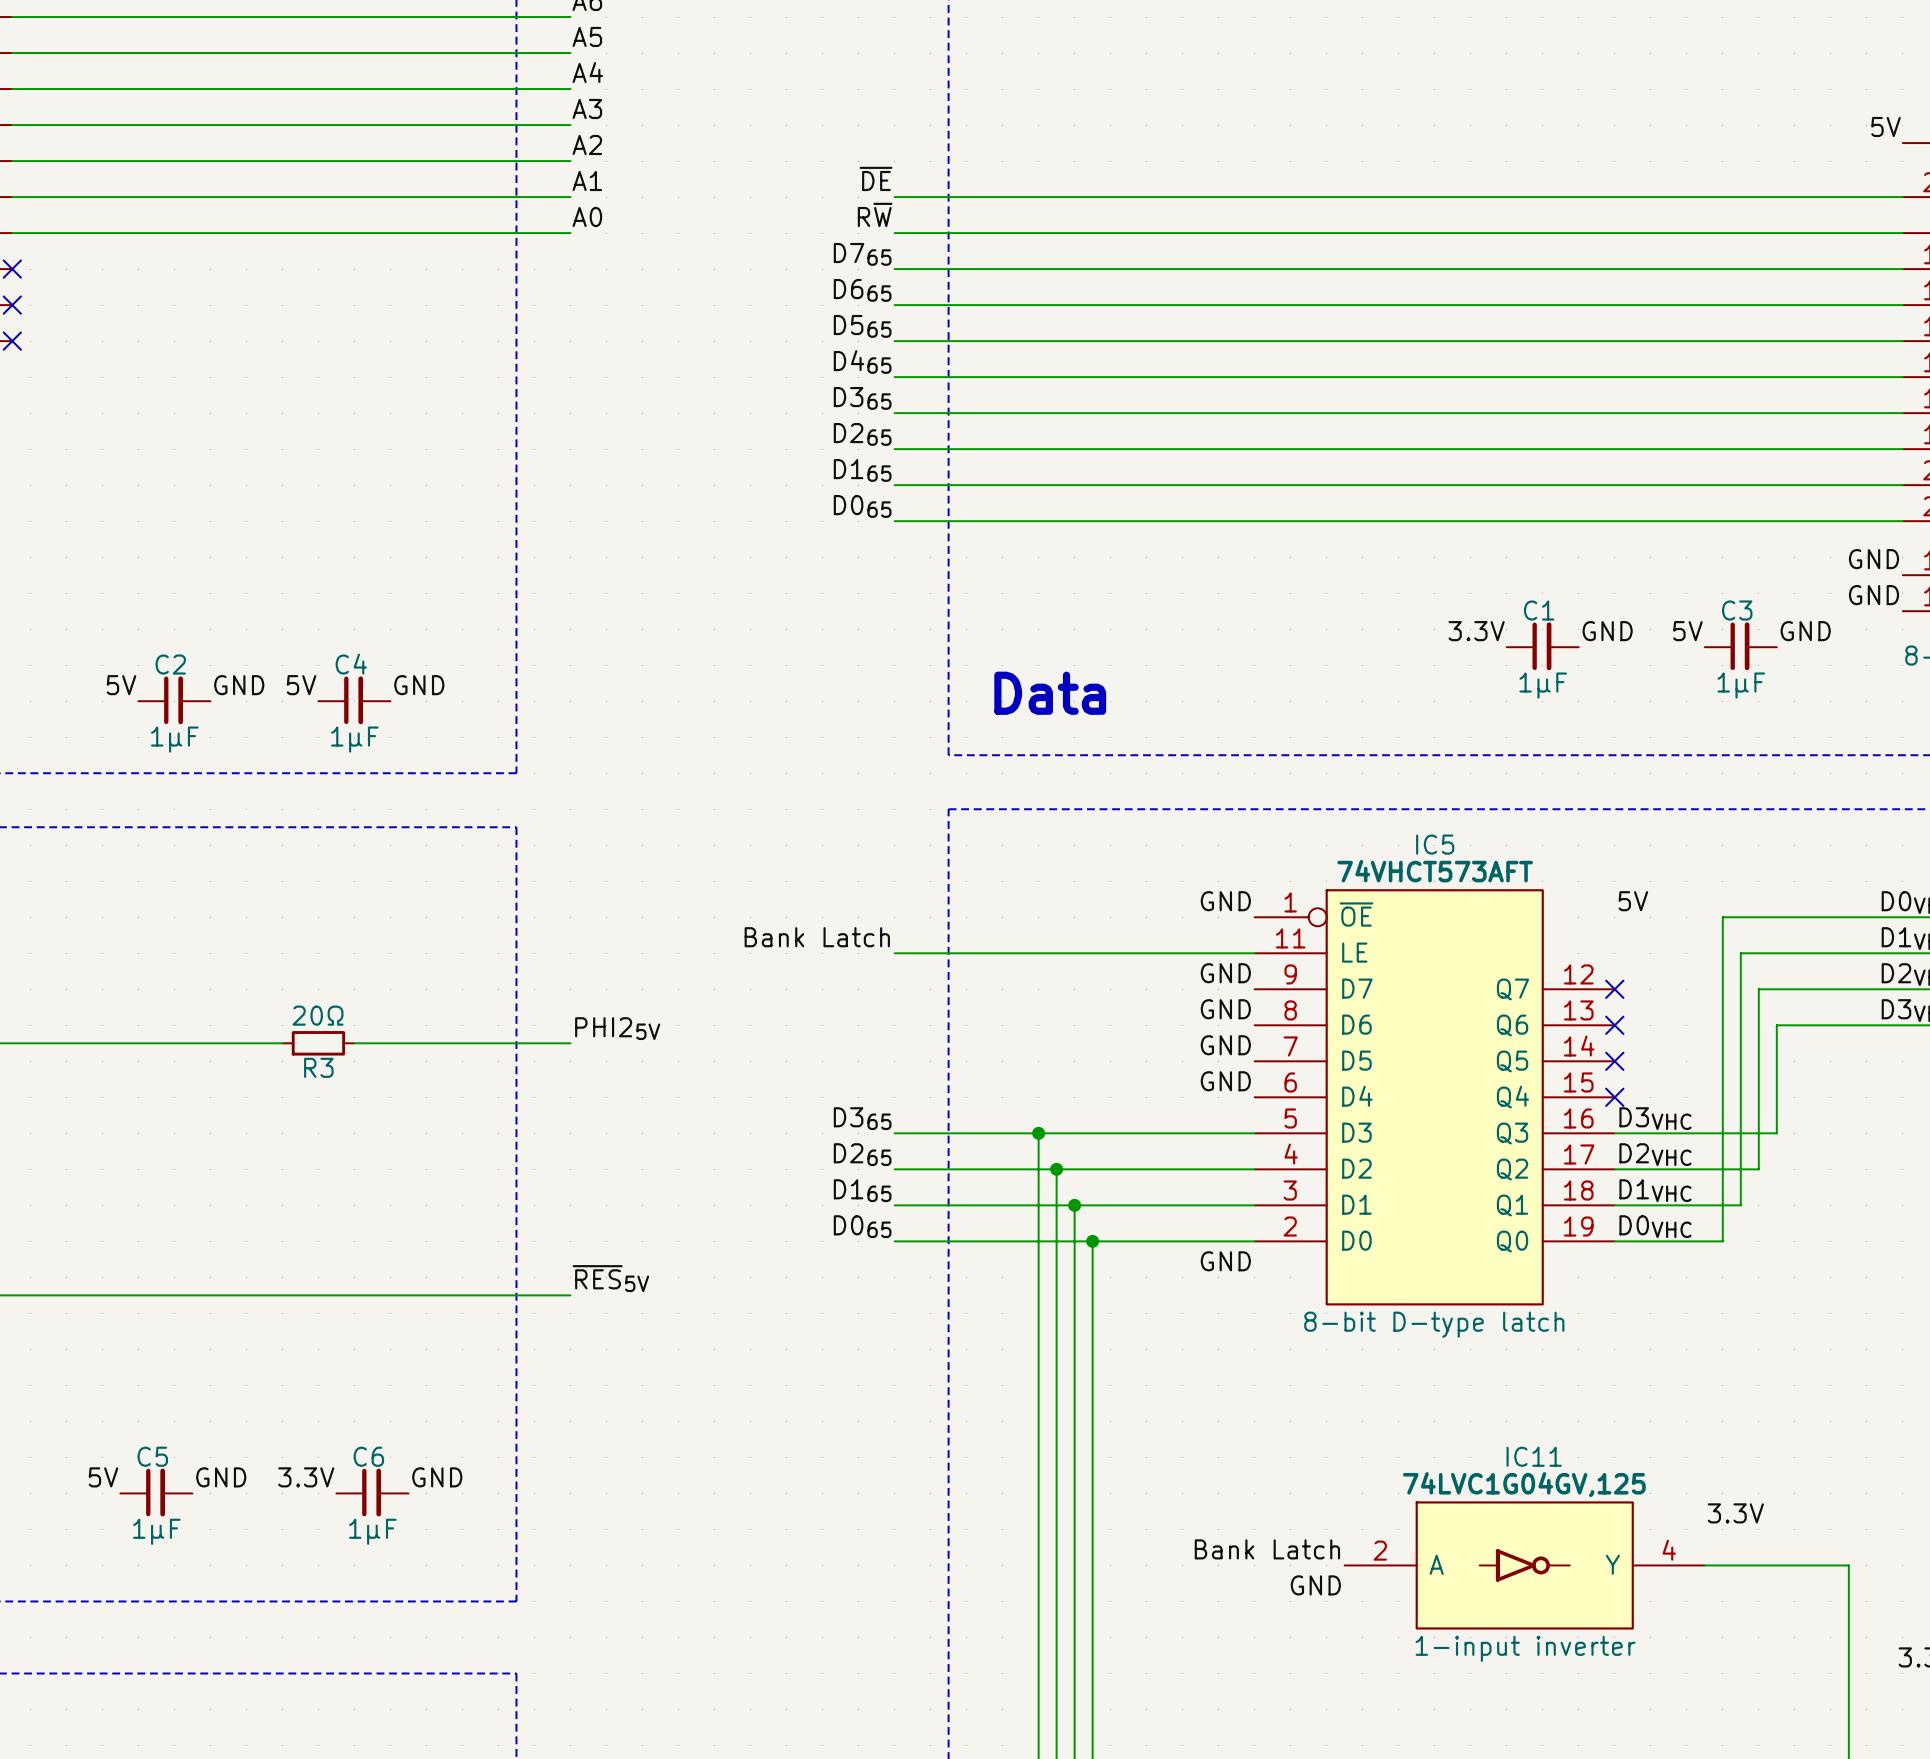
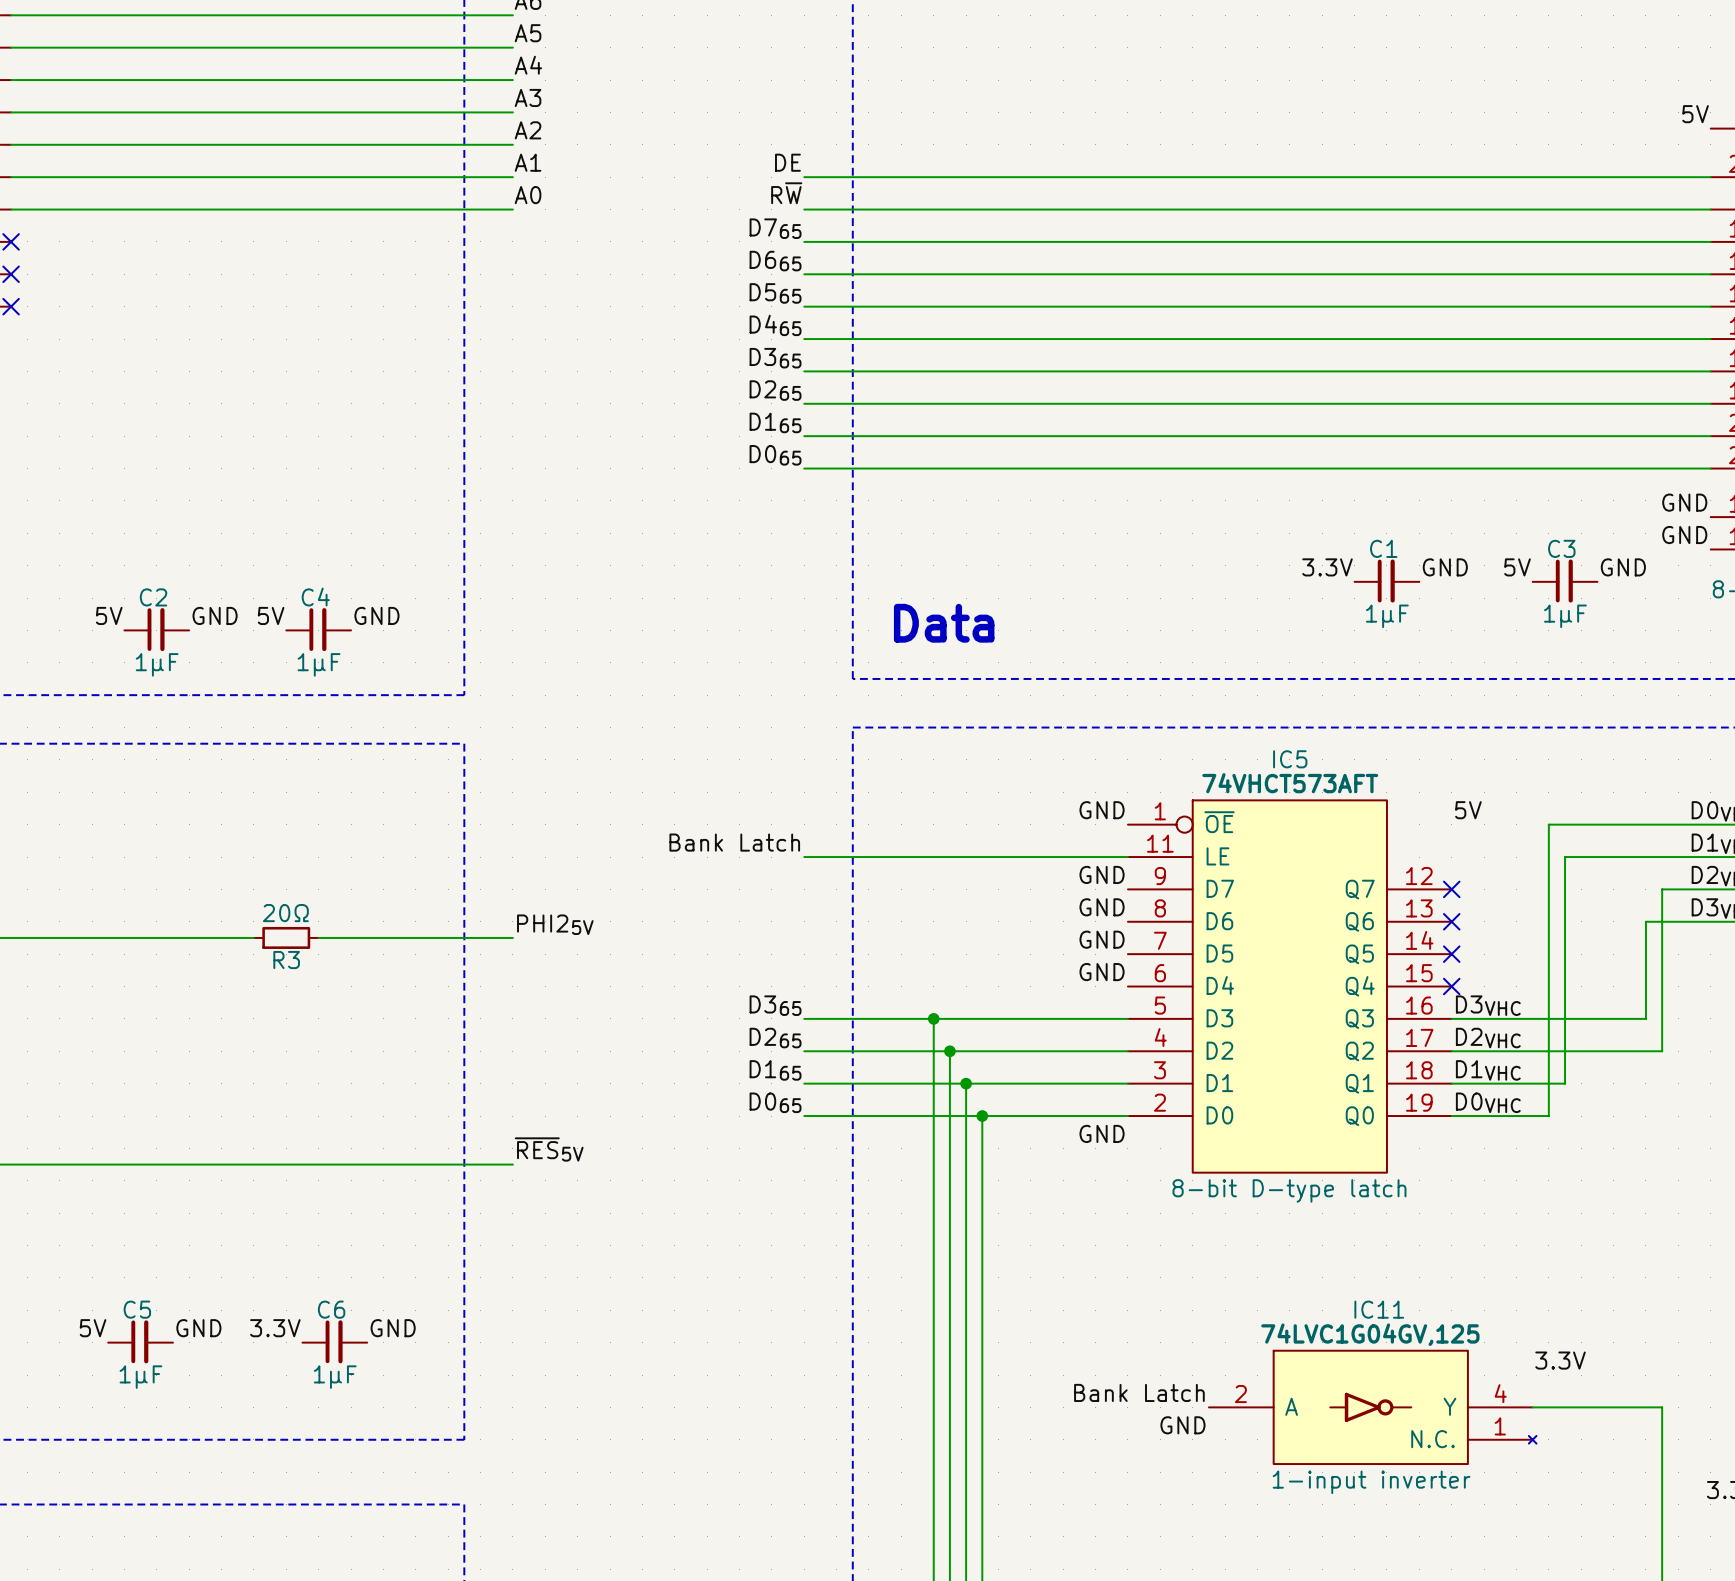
label: ~{DE} (876, 178) -> DE (787, 162)
wire: (1848, 989) (1758, 989) (1758, 1169) -> (1662, 889) (1662, 1051) (1581, 1051)
wire: (1830, 1025) (1776, 1025) (1776, 1133) -> (1645, 921) (1645, 1018) (1597, 1018)
IC11 symbol: [1344, 1501, 1705, 1630] -> [1208, 1349, 1537, 1466]

